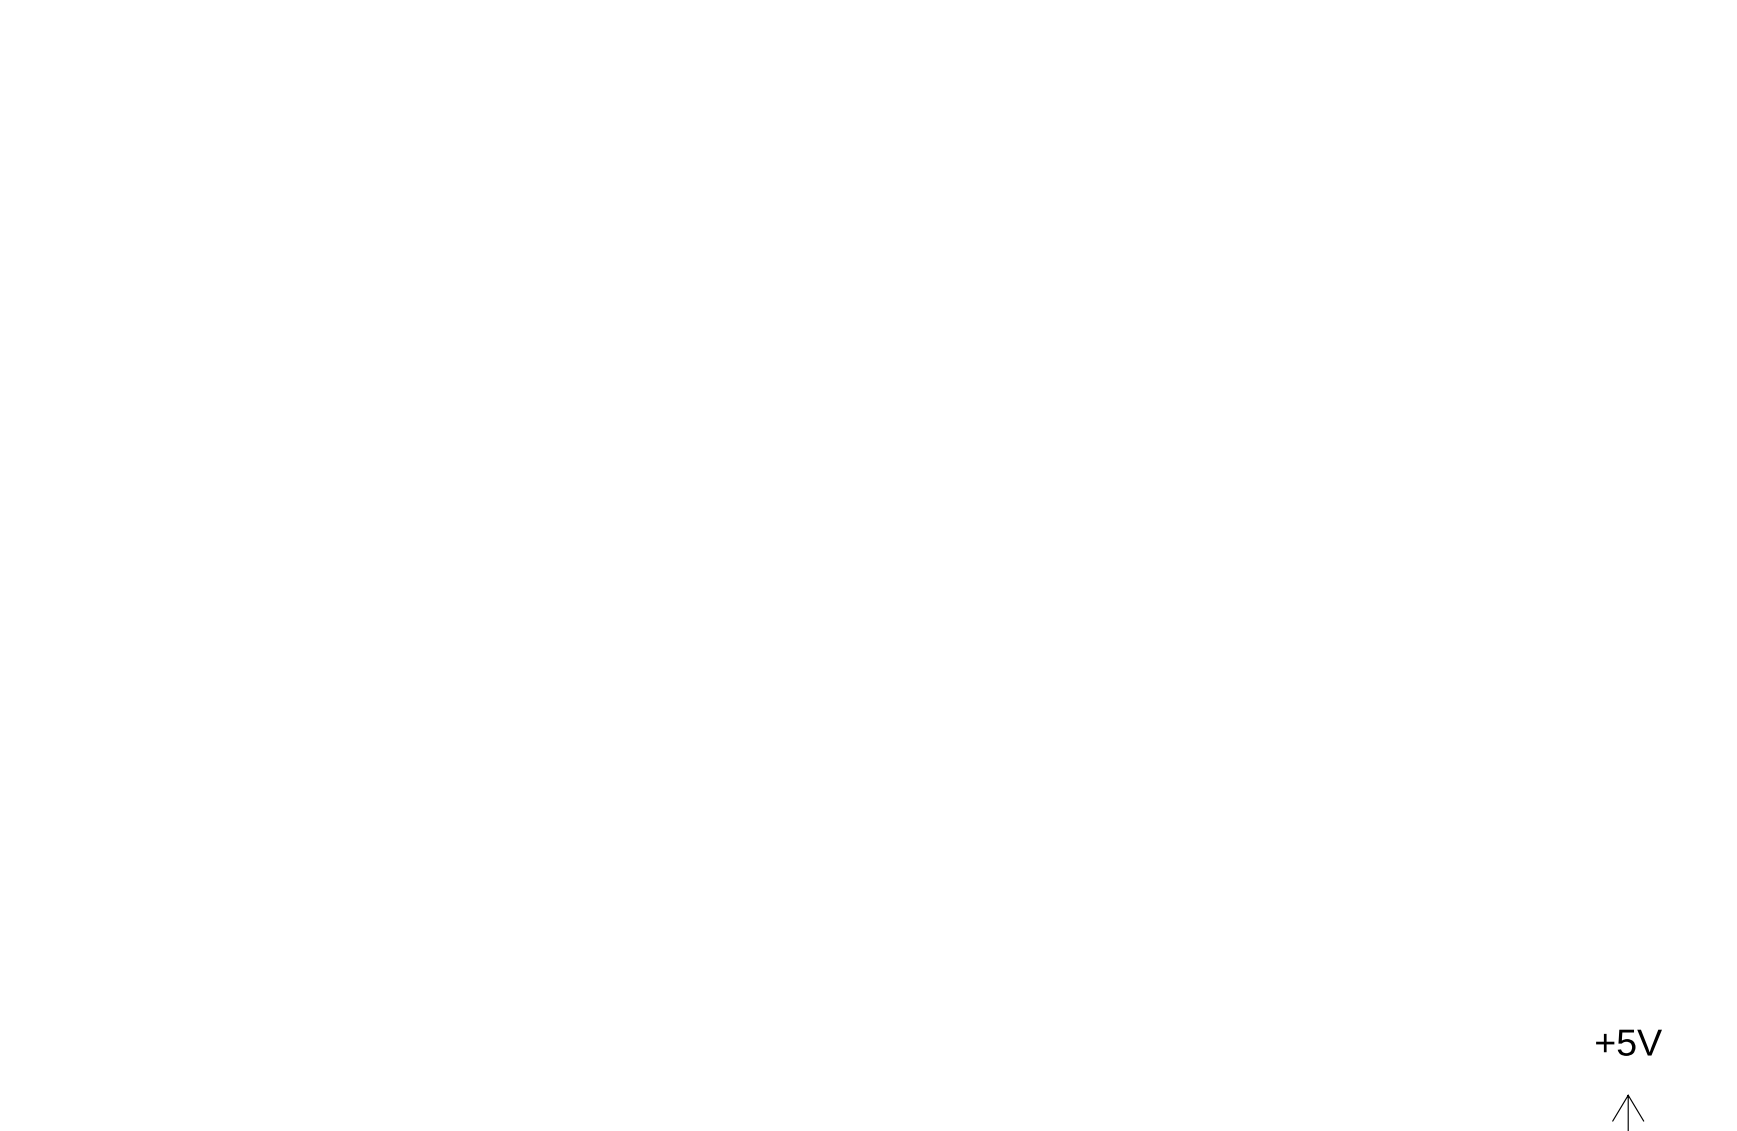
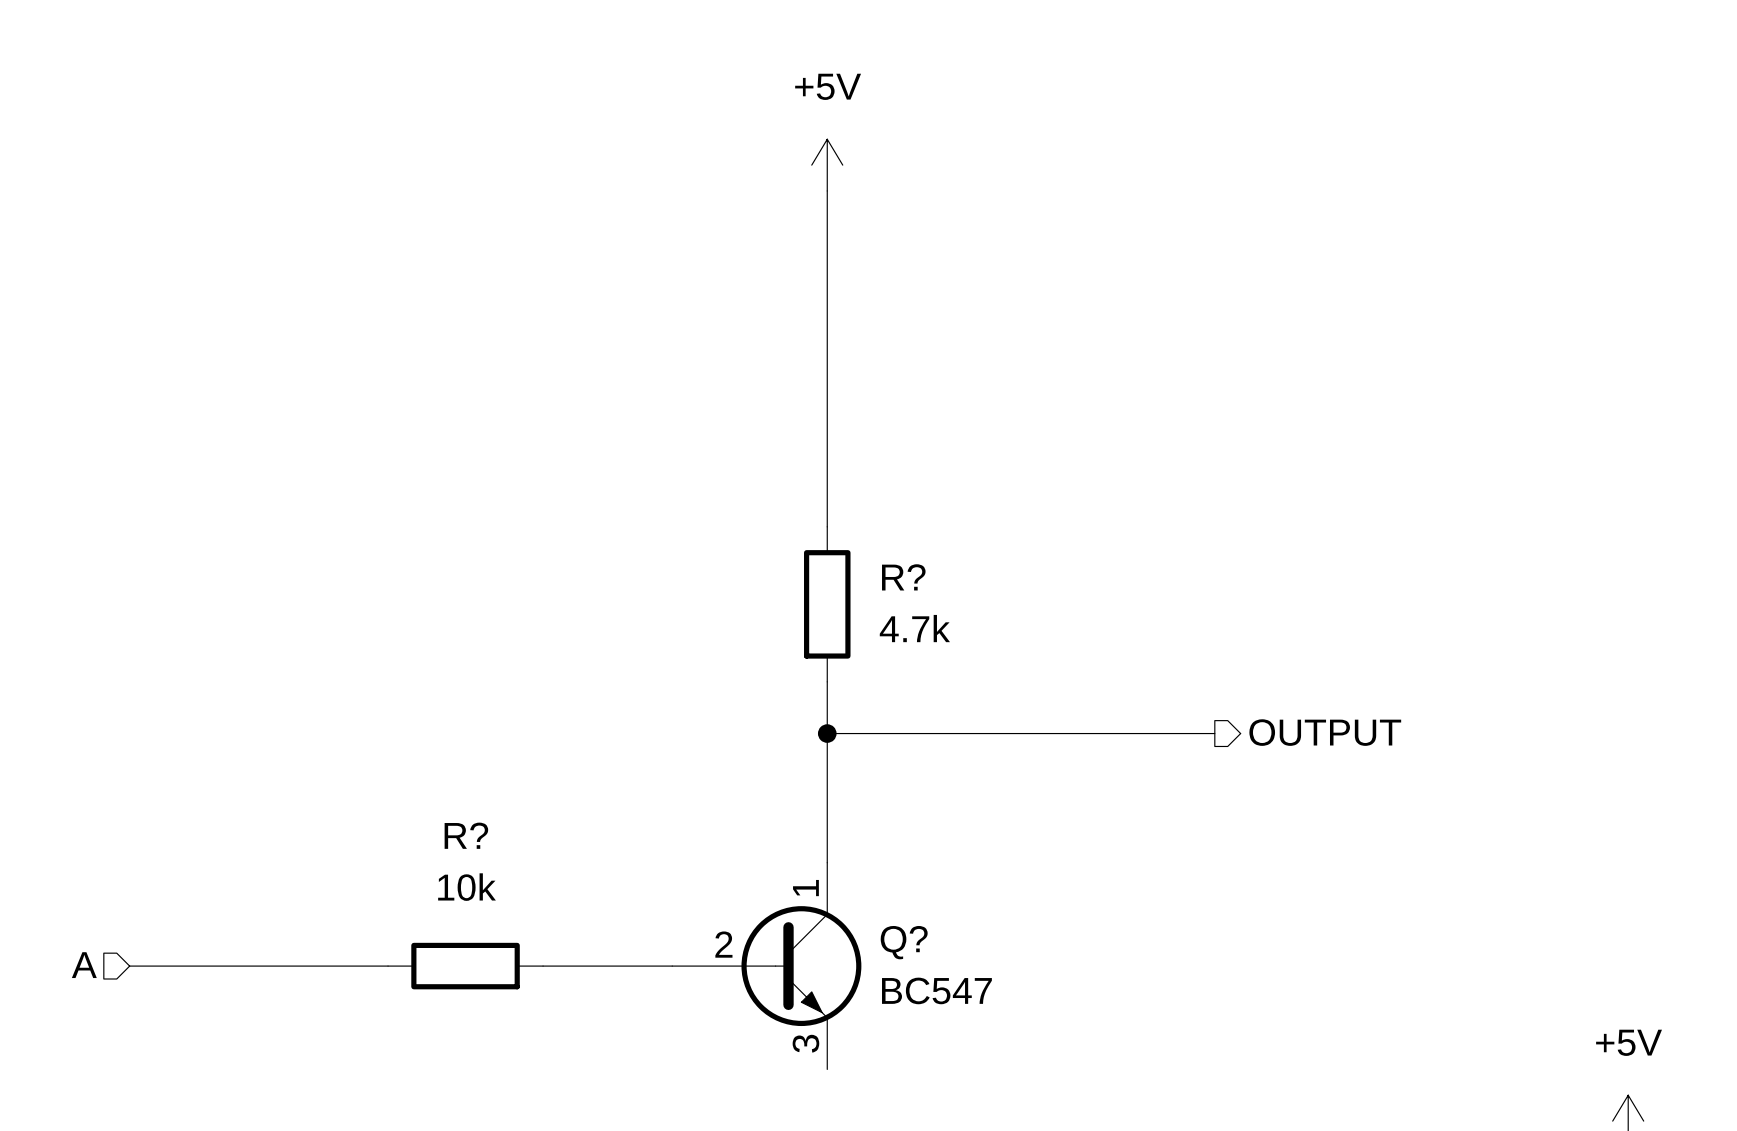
power symbol: none -> +5V (827, 165)
wire: none -> (827, 190) (827, 526)
R?: none -> 4.7k (827, 604)
wire: none -> (827, 681) (827, 862)
hierarchical label: none -> OUTPUT (1325, 732)
wire: none -> (827, 733) (1214, 733)
junction: none -> (827, 733)
hierarchical label: none -> A (84, 965)
wire: none -> (129, 966) (388, 966)
R?: none -> 10k (465, 966)
wire: none -> (543, 966) (672, 966)
Q?: none -> BC547 (766, 966)

